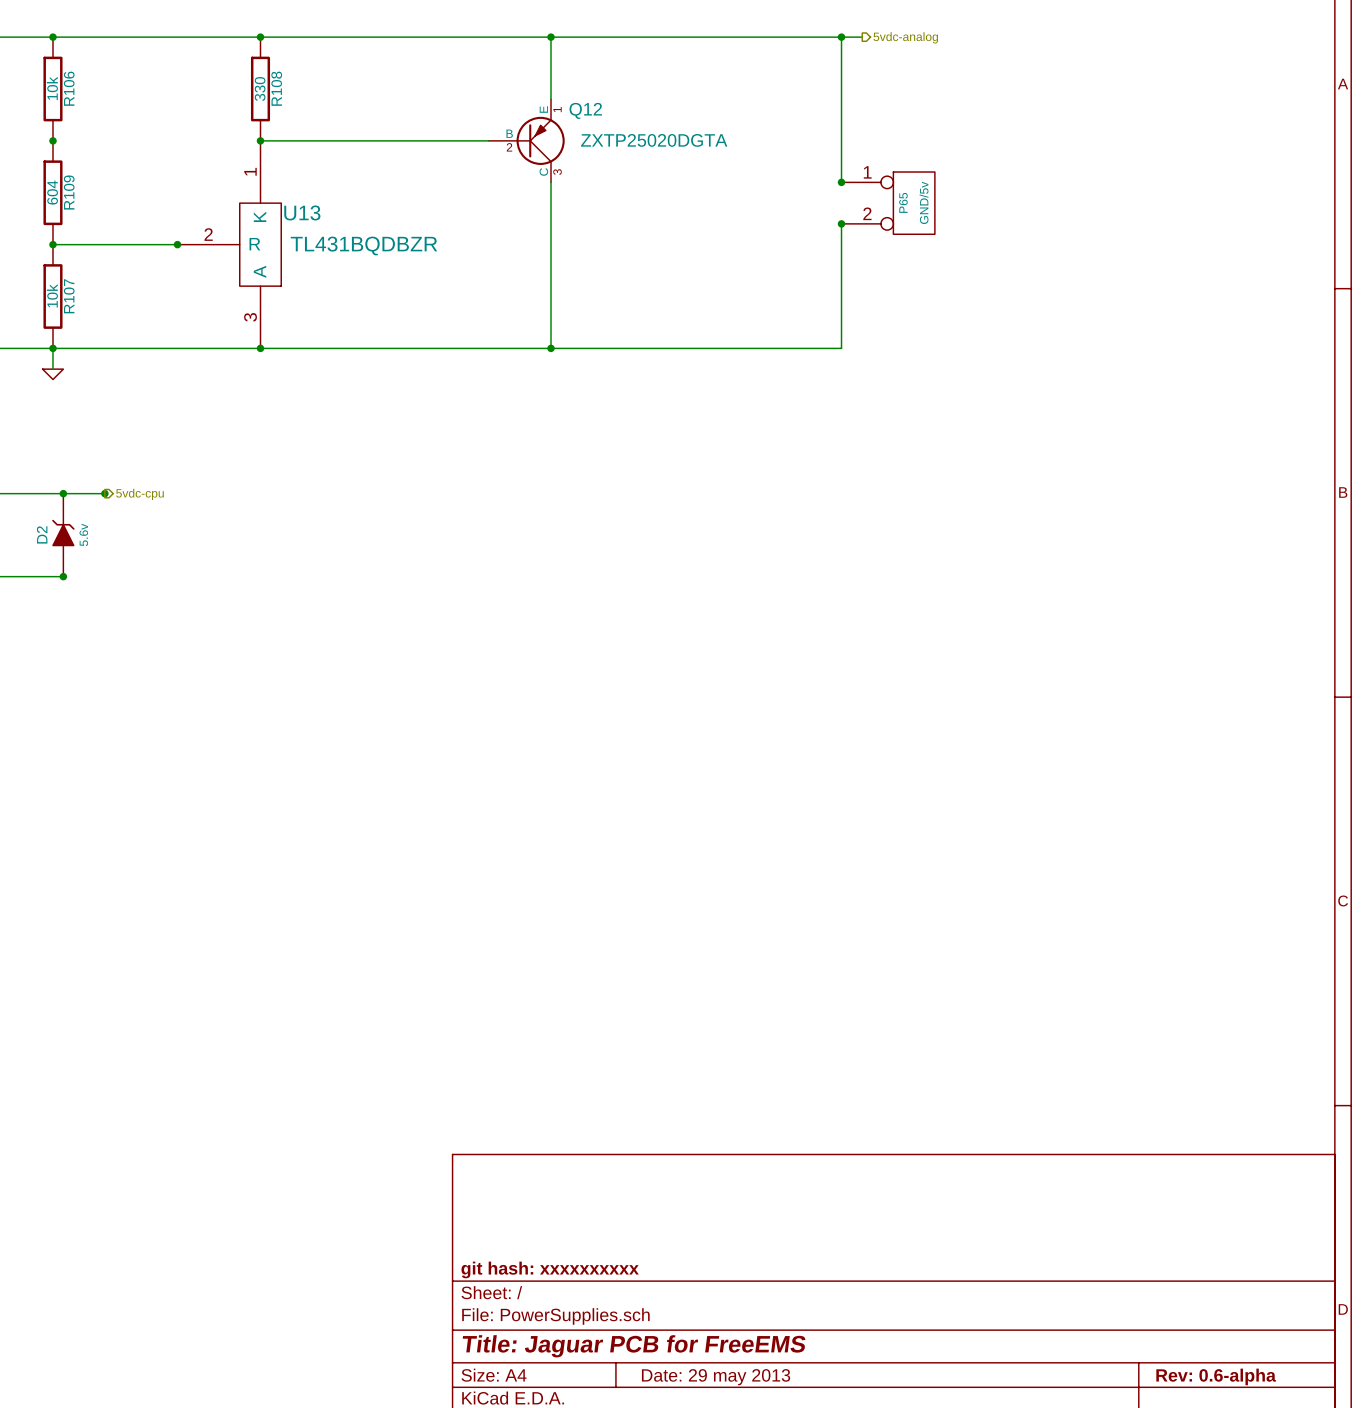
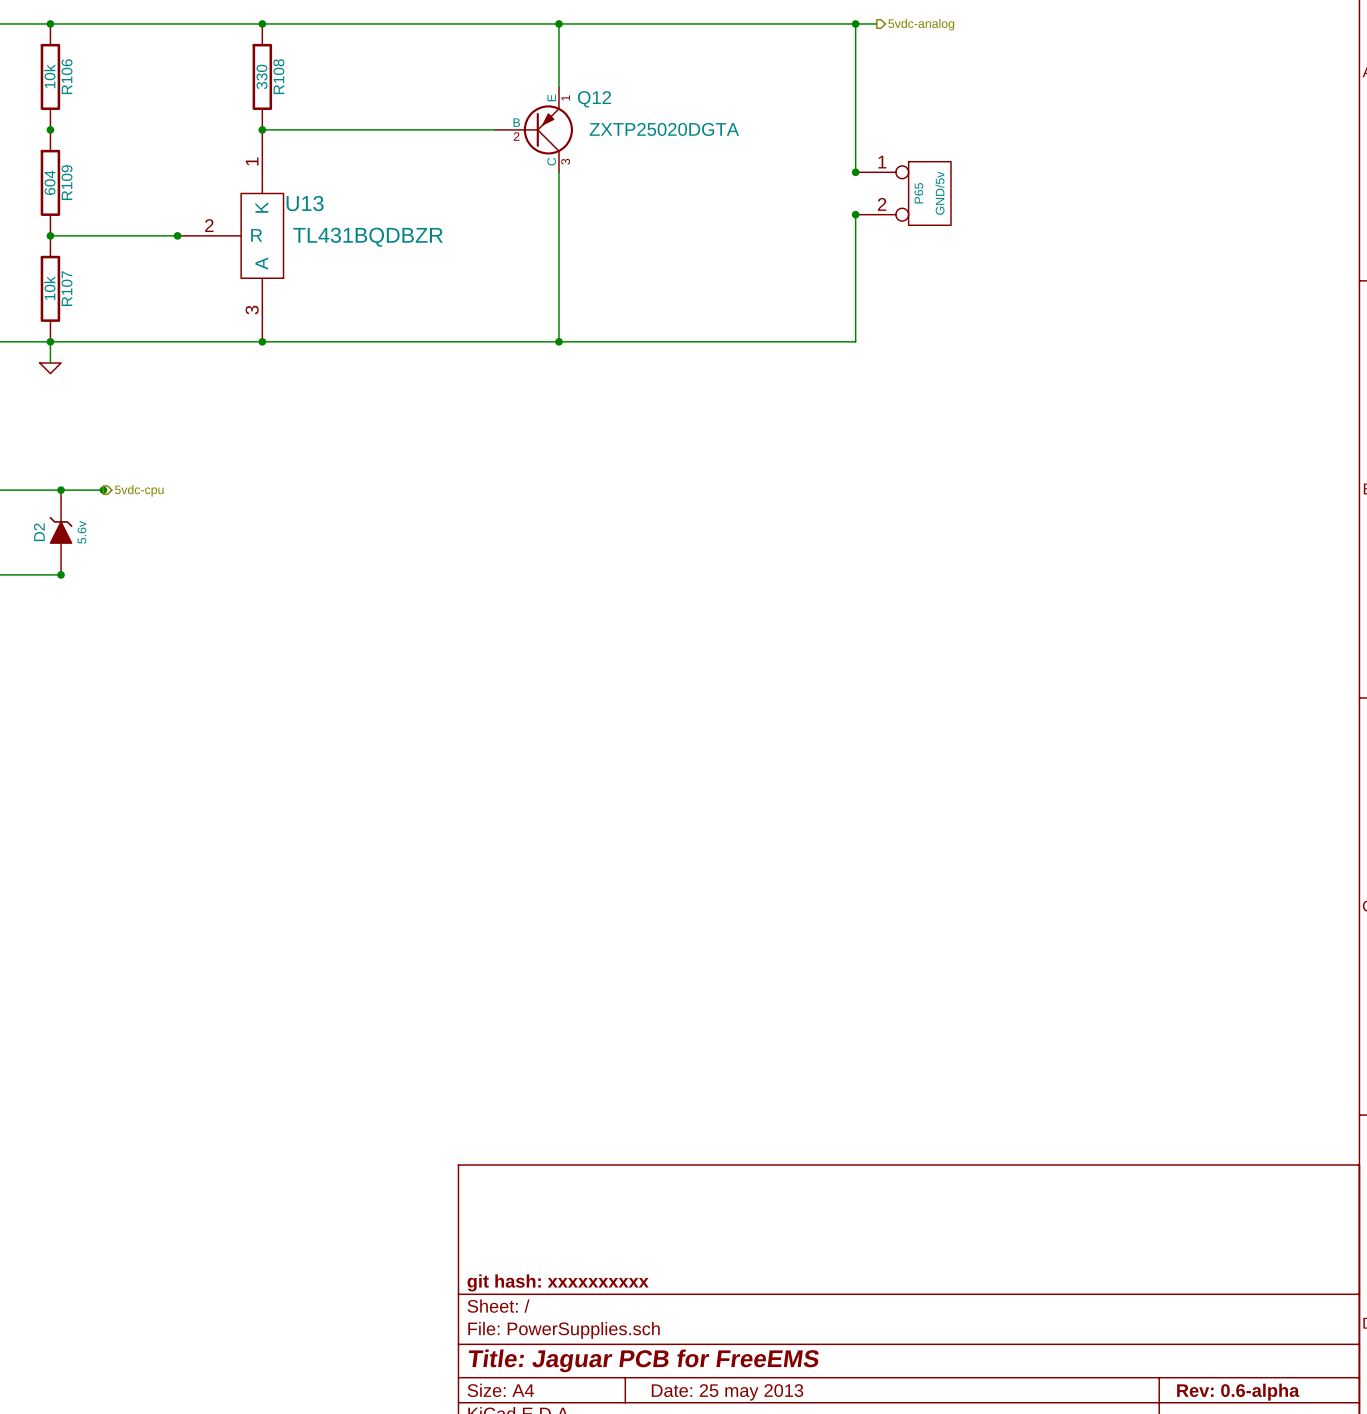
title block: Date: 29 may 2013 (716, 1377) -> Date: 25 may 2013 (727, 1392)

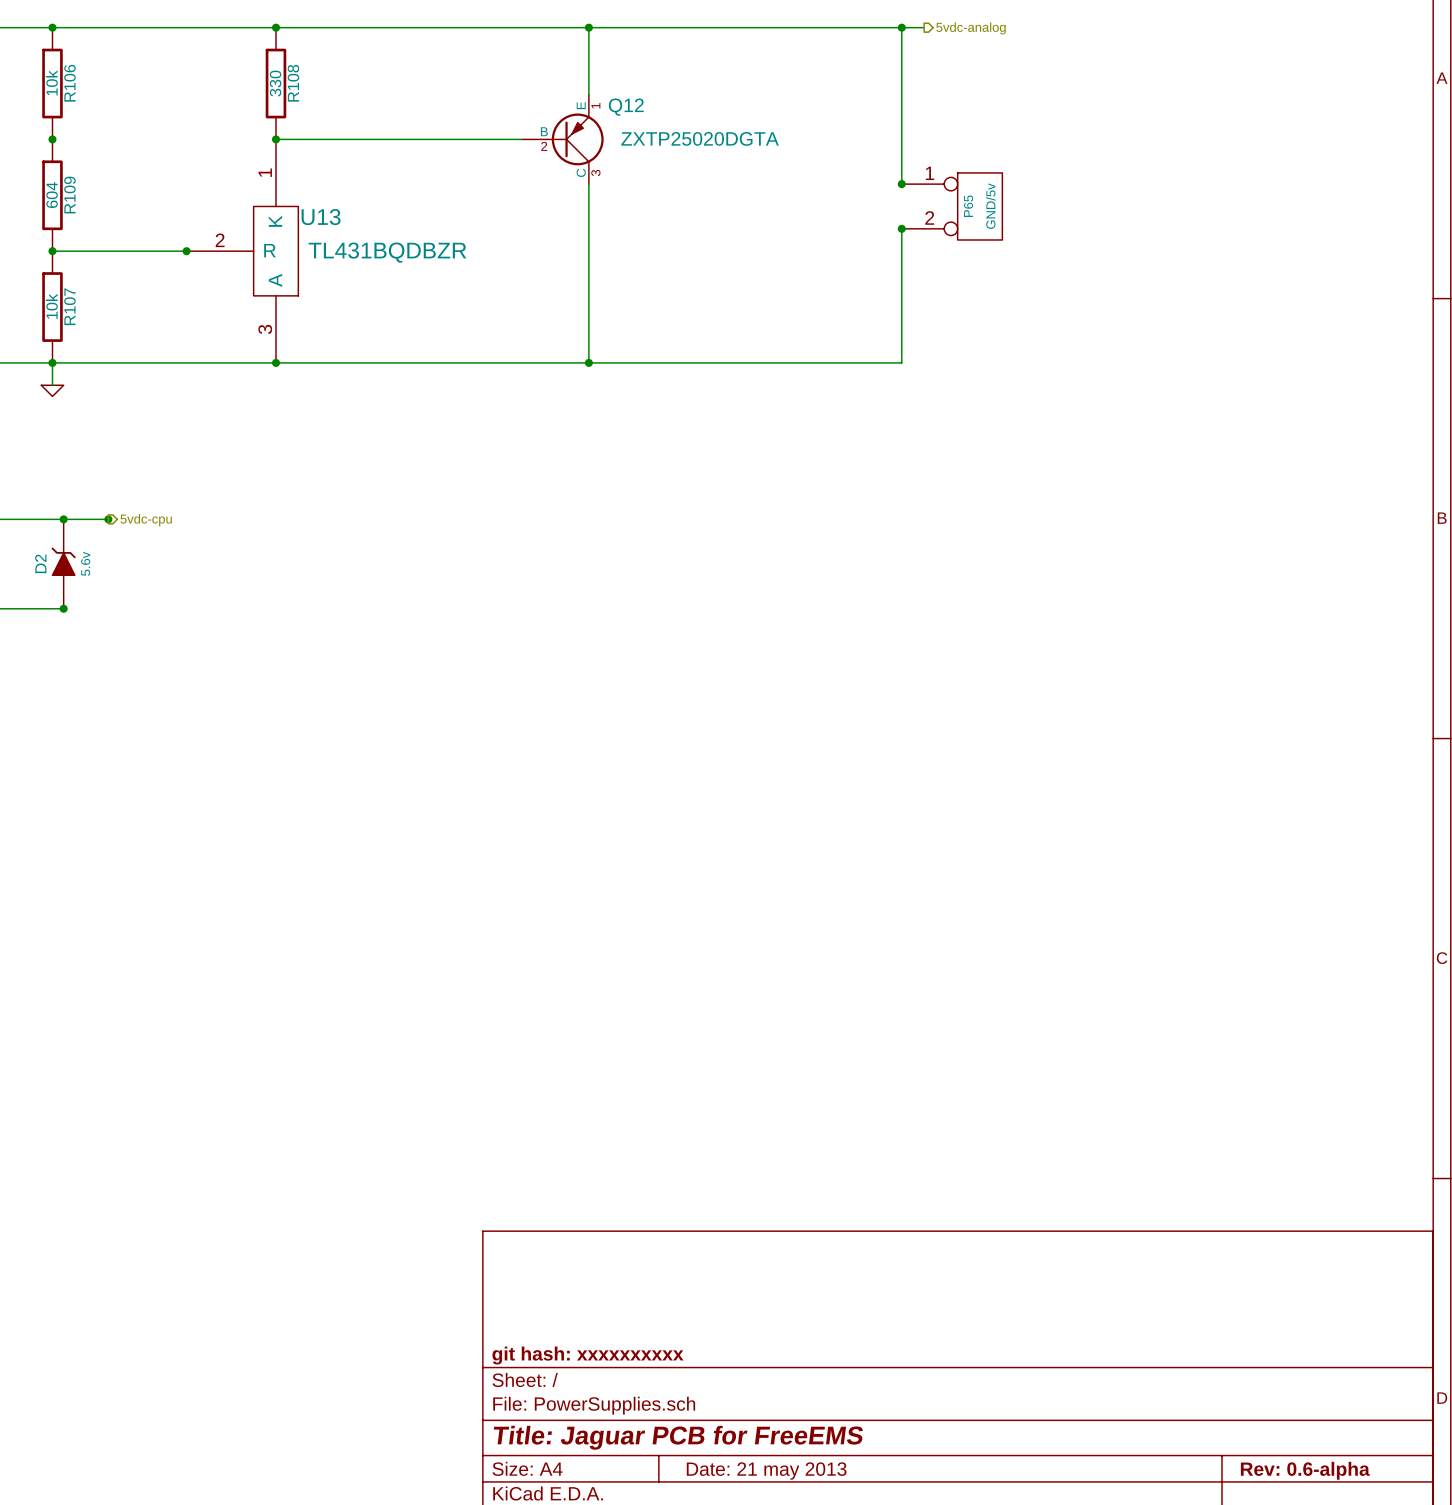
title block: Date: 25 may 2013 (727, 1392) -> Date: 21 may 2013 (766, 1471)

